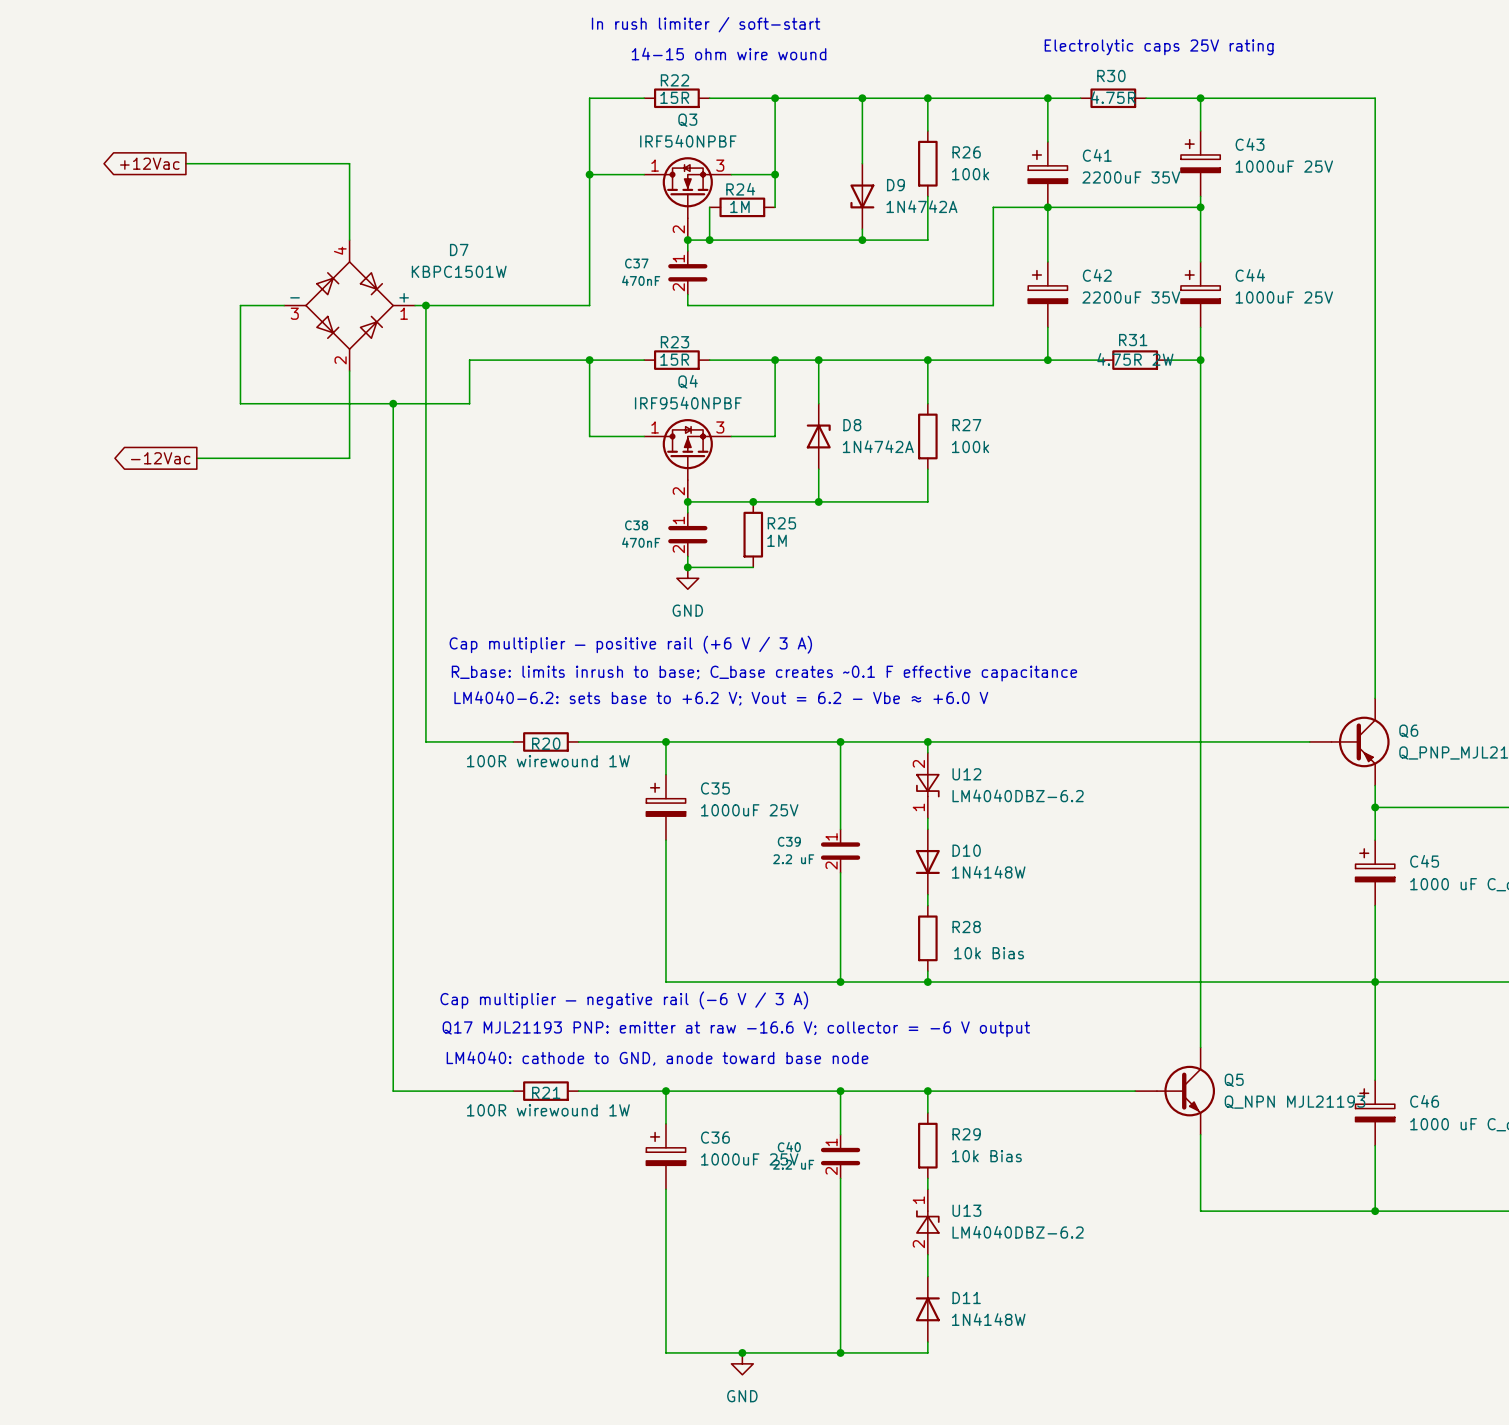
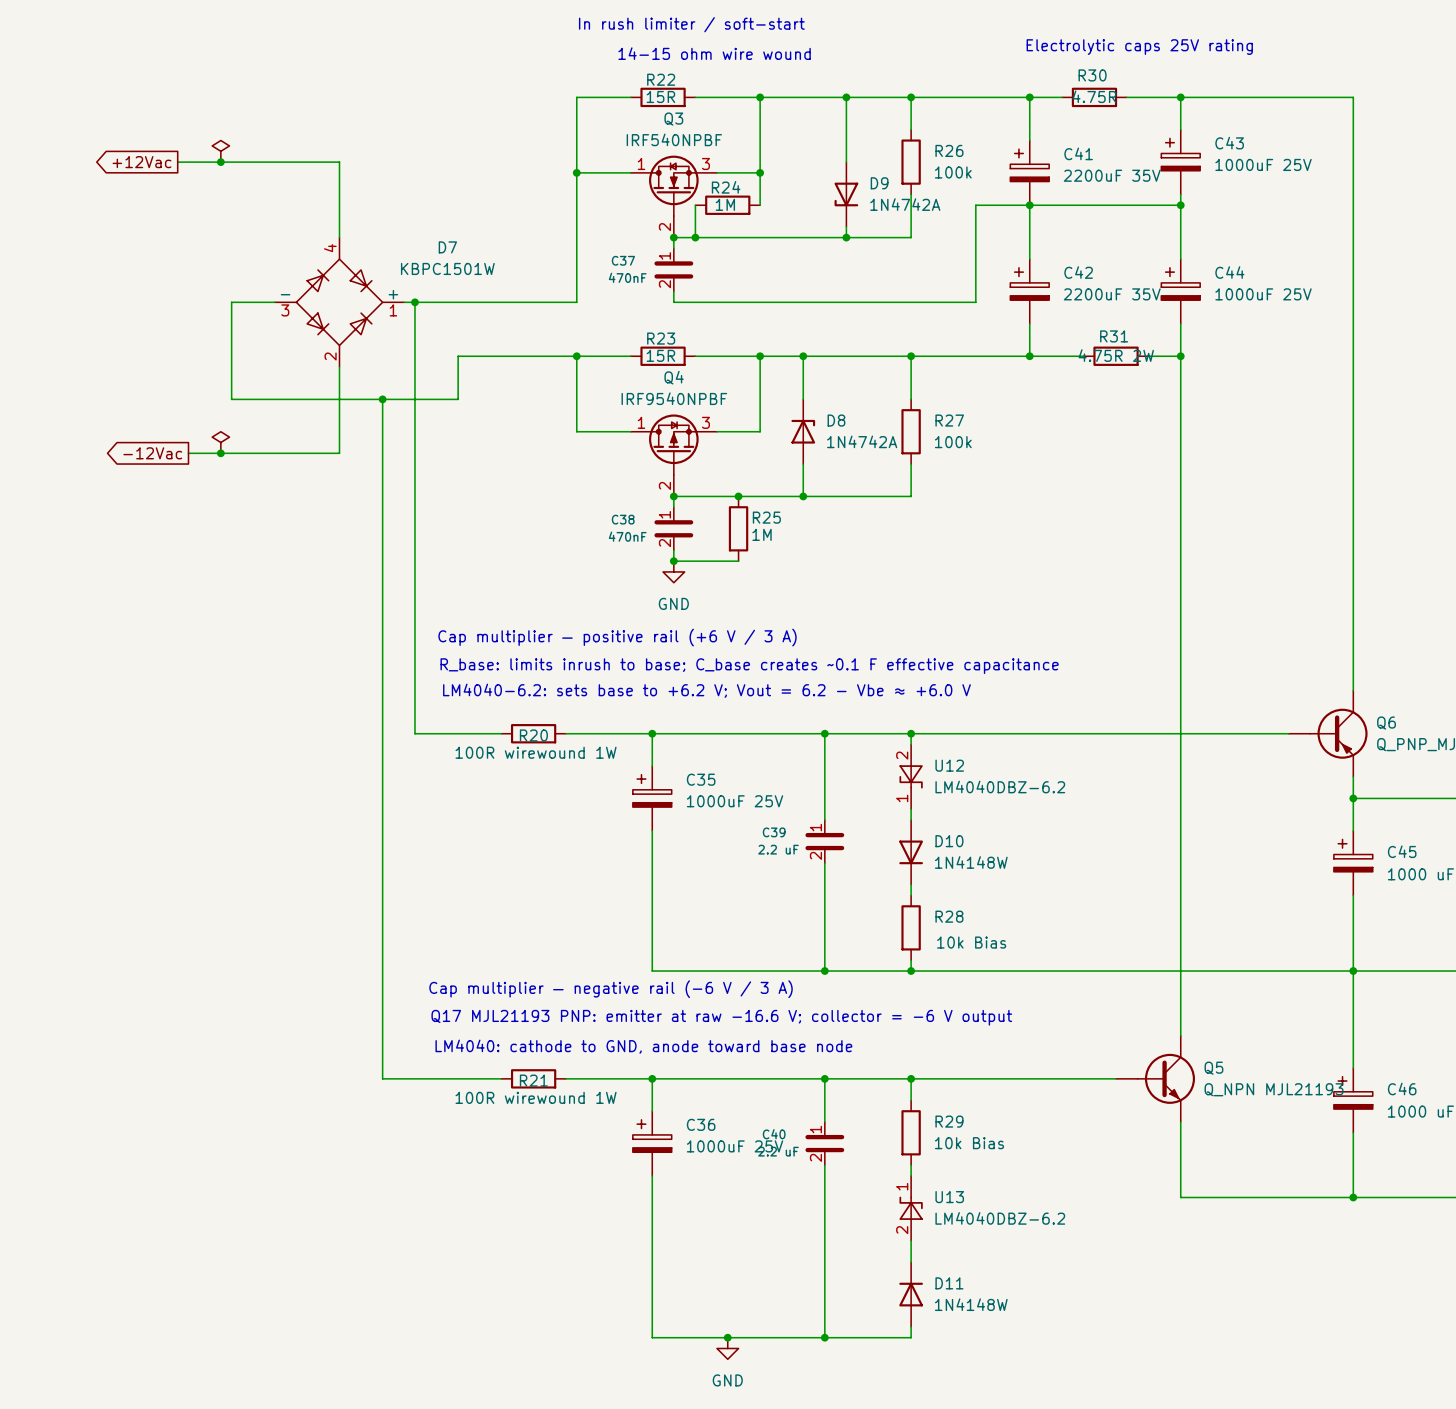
power symbol: none -> (220, 151)
junction: none -> (220, 162)
power symbol: none -> (220, 442)
junction: none -> (220, 453)

